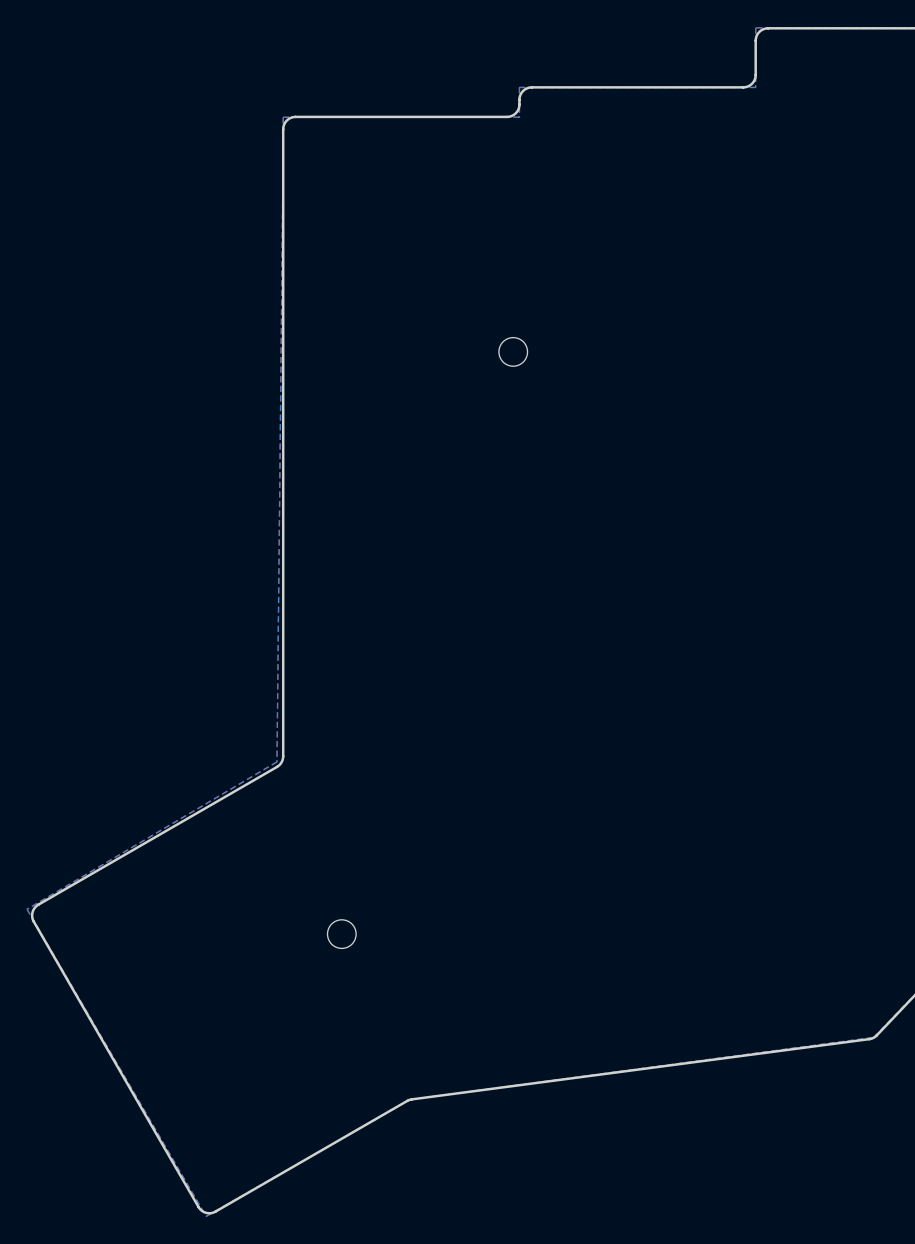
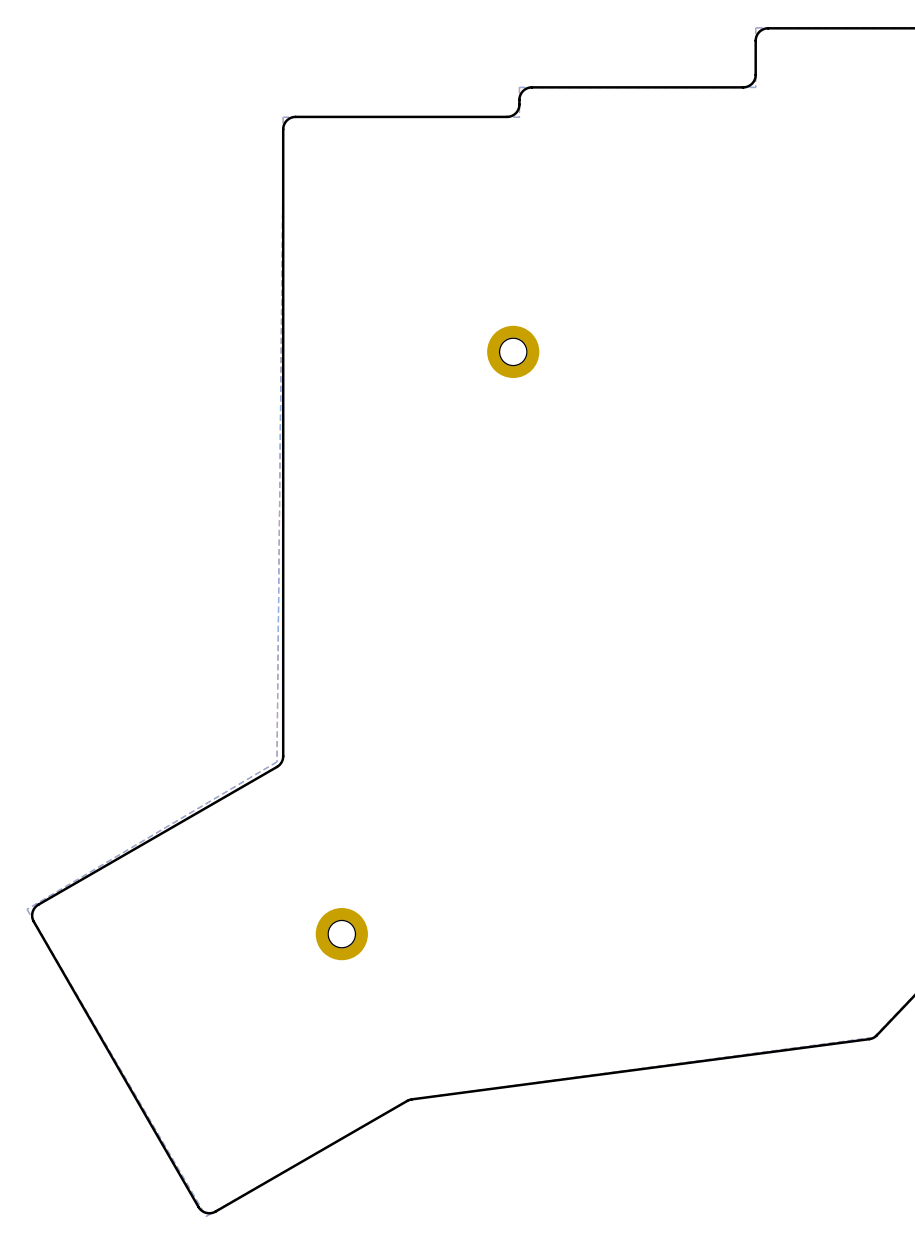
drawing: [498, 336, 529, 367] -> none
part: none -> (513, 351)
drawing: [326, 919, 357, 950] -> none
part: none -> (341, 934)

